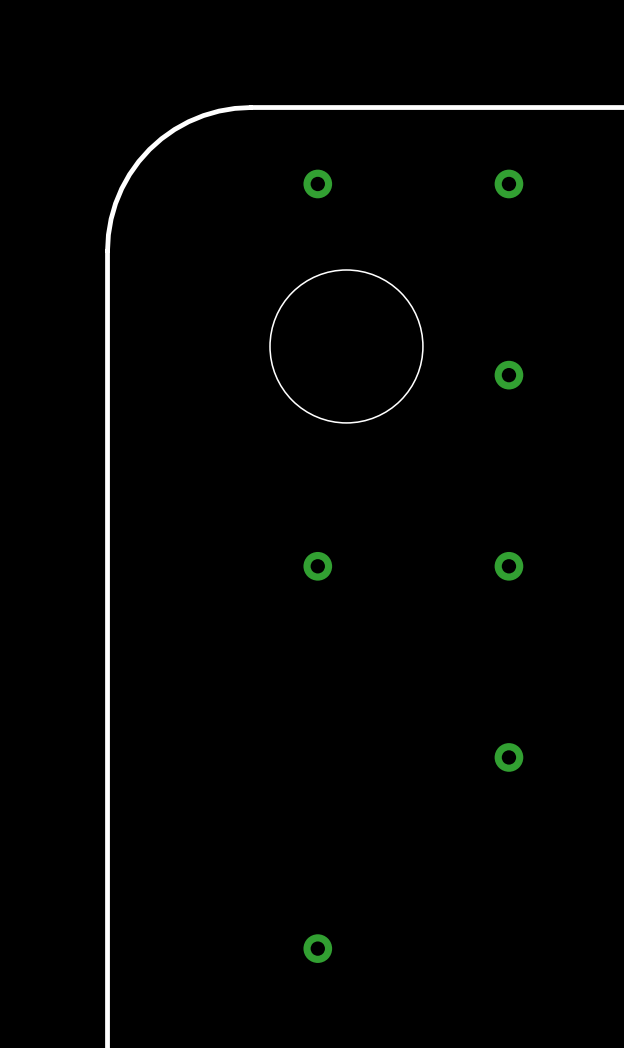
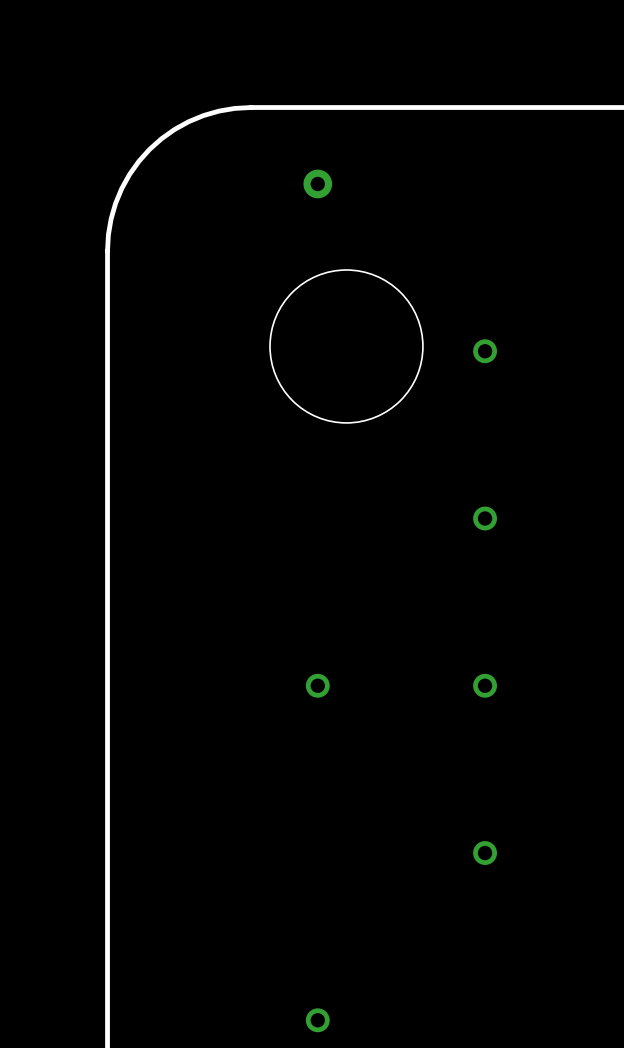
via: (508, 183) -> none
via position: (508, 375) -> (485, 351)
via: none -> (485, 518)
via: (317, 566) -> none
via: (508, 566) -> none
via: none -> (317, 685)
via: none -> (485, 685)
via: (508, 757) -> none
via: none -> (485, 853)
via: (317, 948) -> none
via: none -> (317, 1020)

